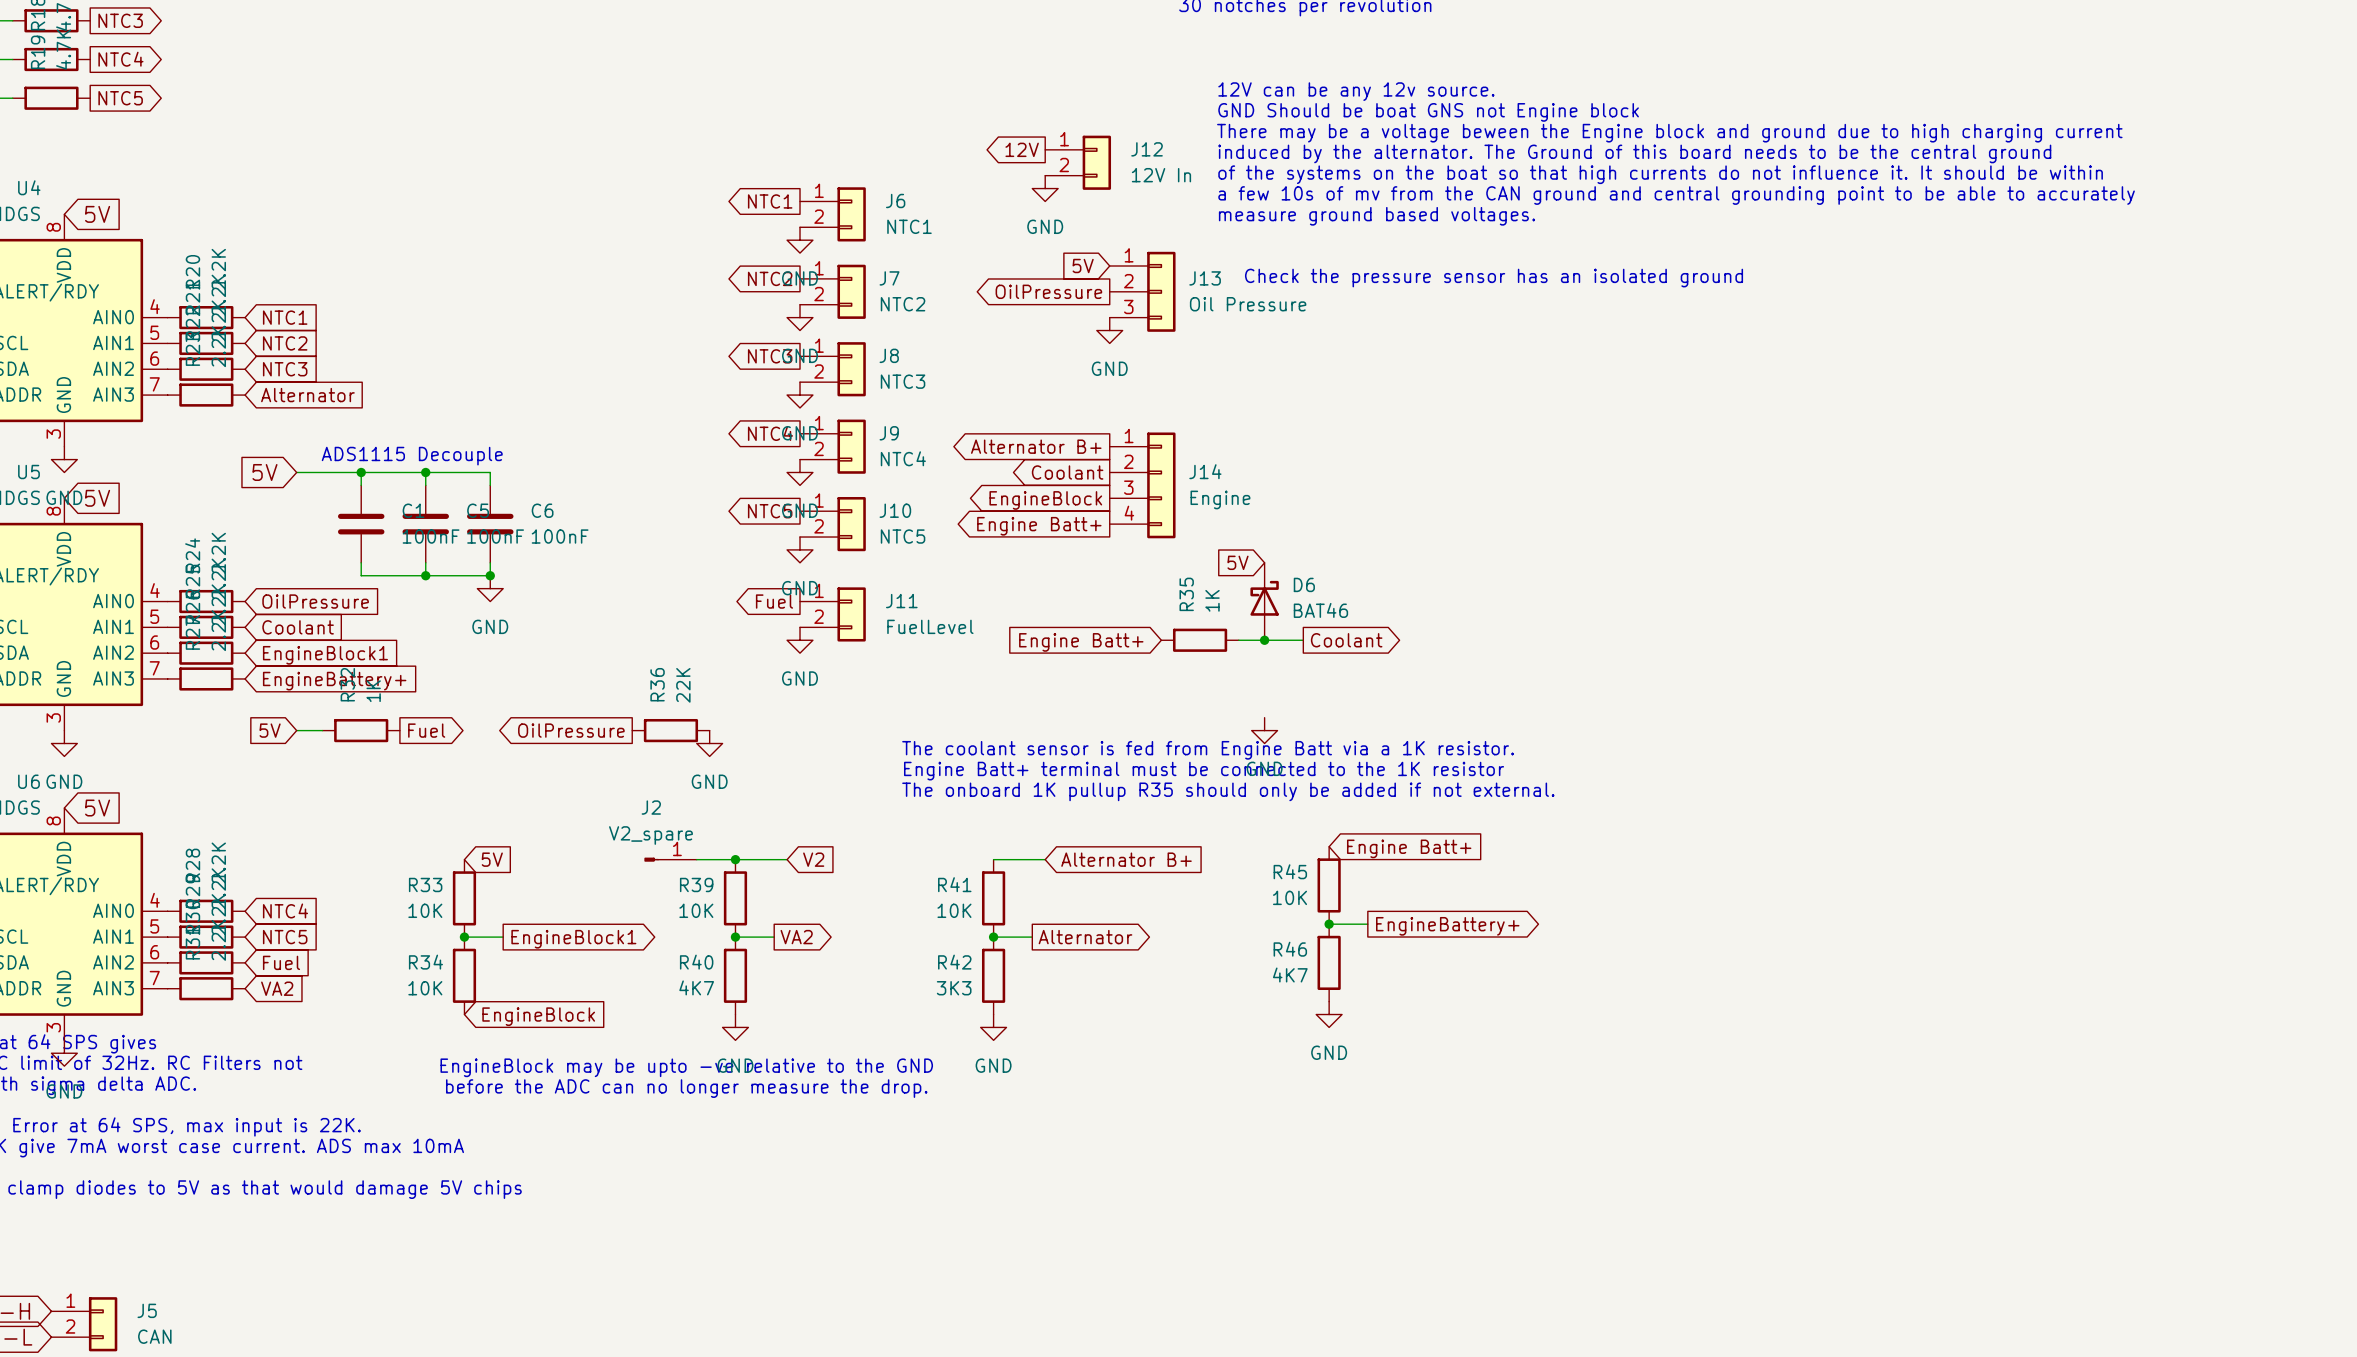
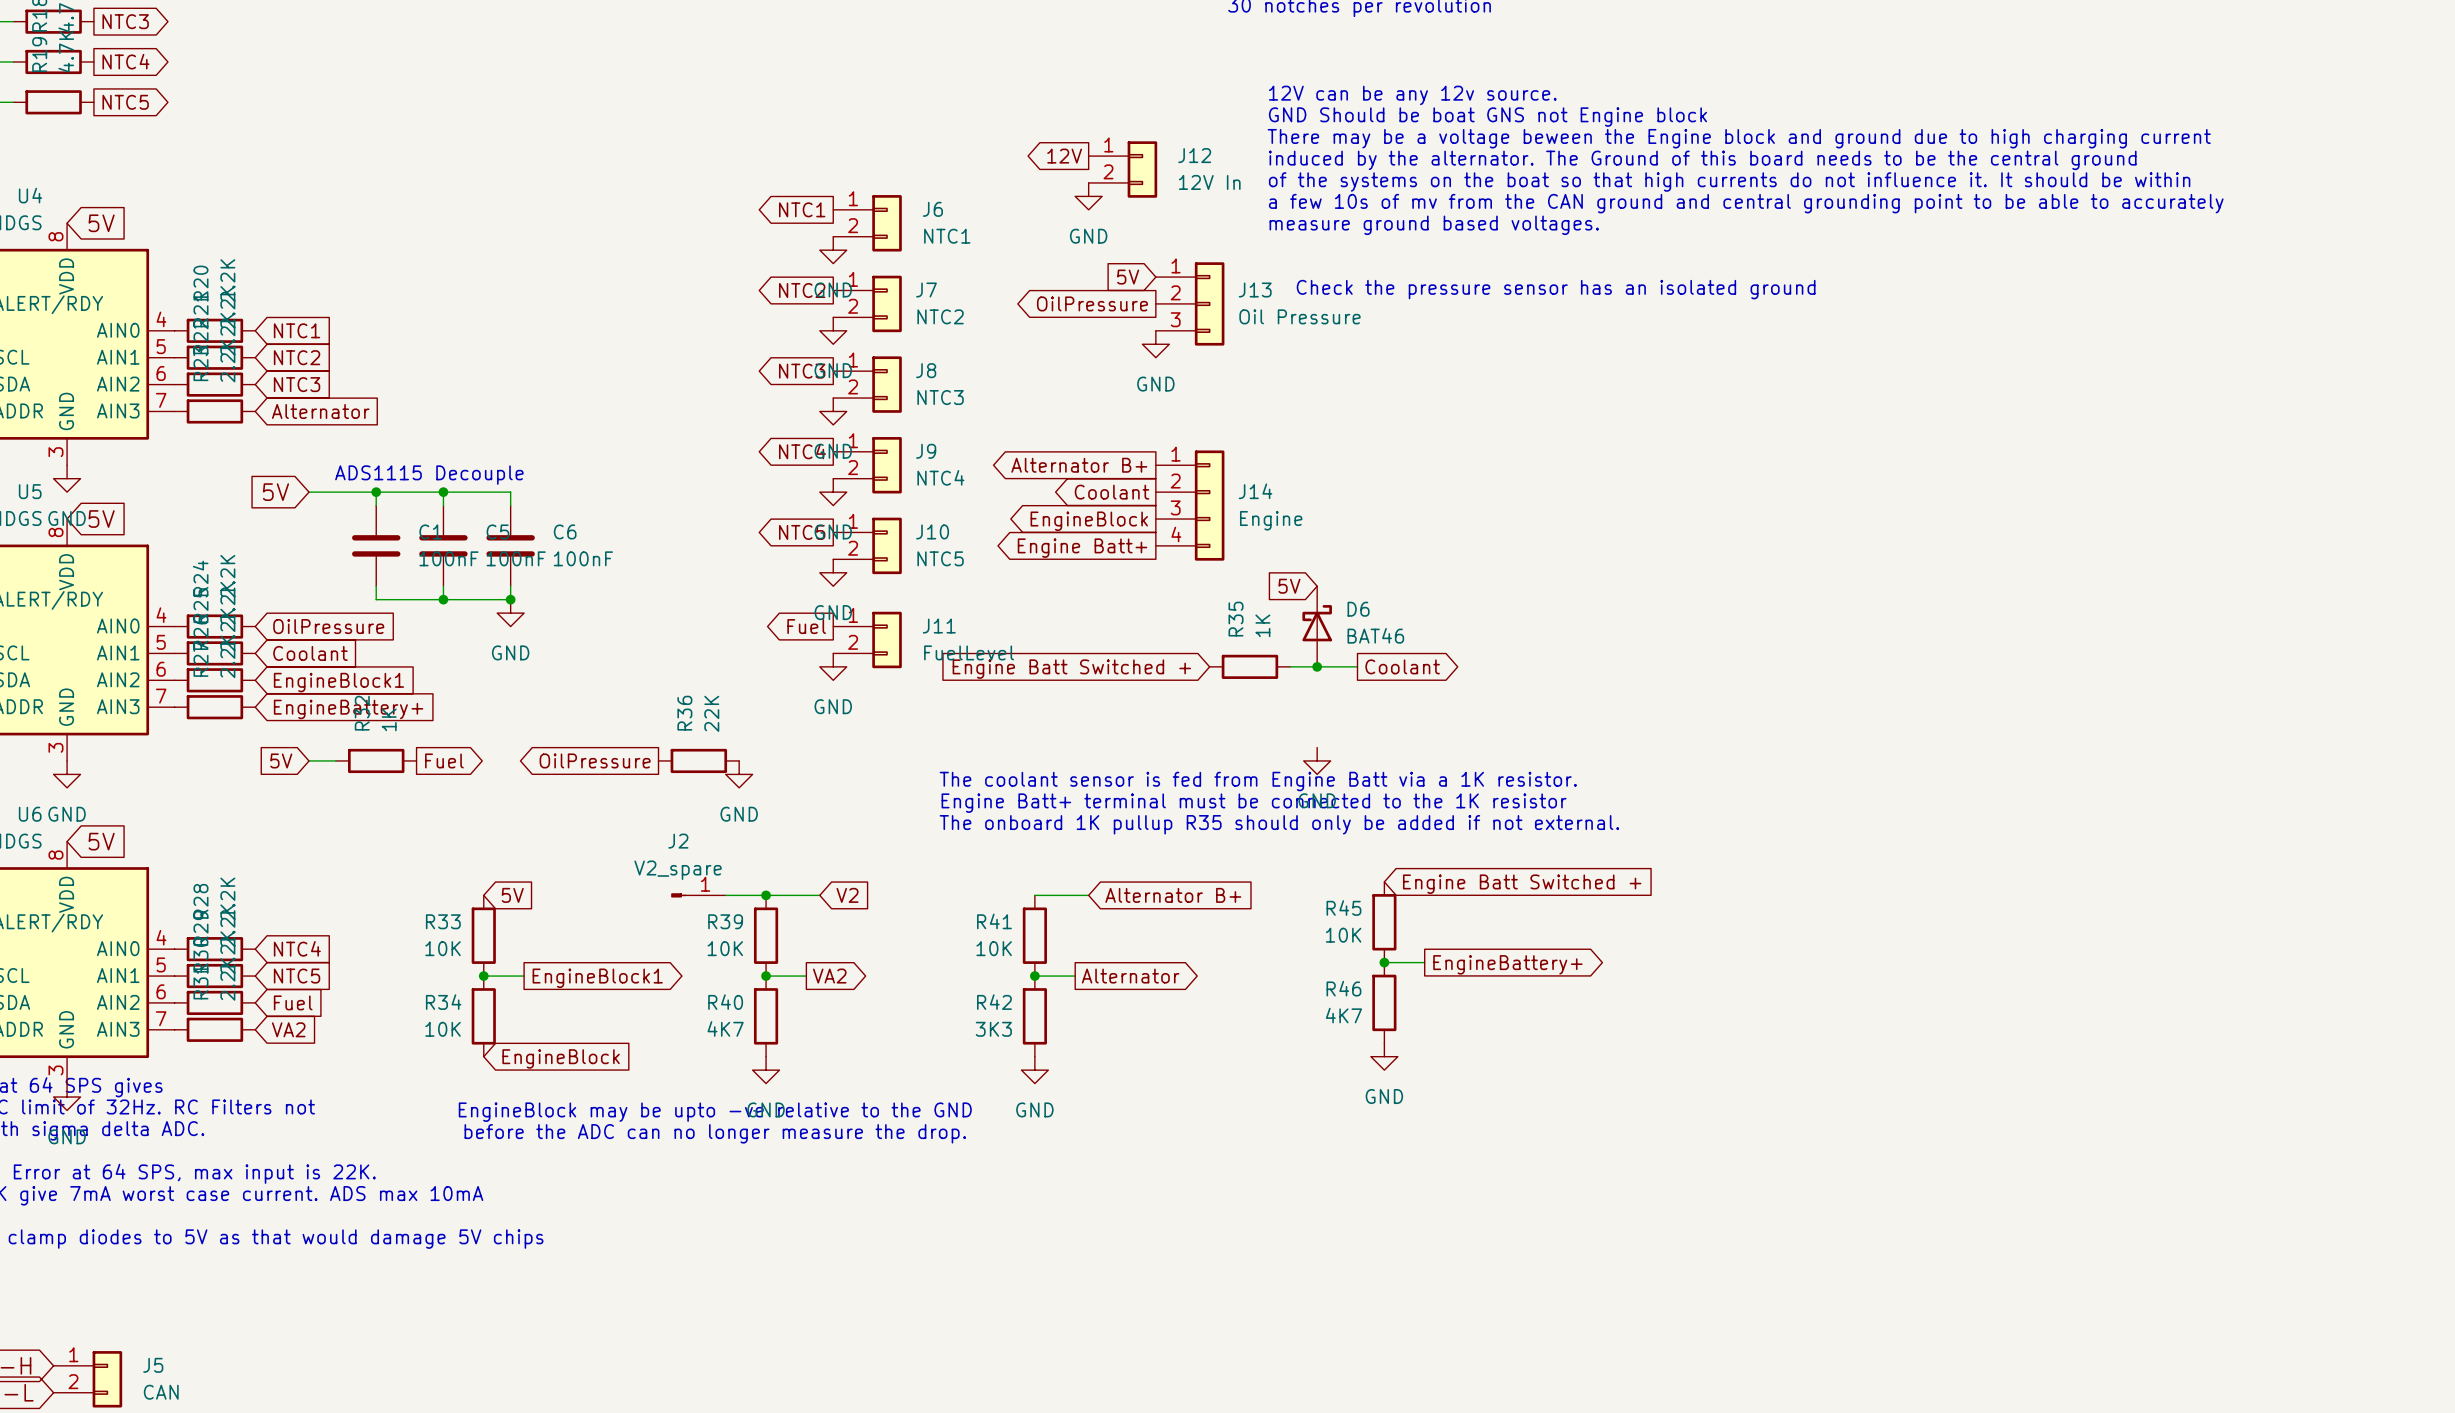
global label: Engine Batt+ (1081, 642) -> Engine Batt Switched + (1071, 669)
global label: Engine Batt+ (1409, 848) -> Engine Batt Switched + (1522, 884)

